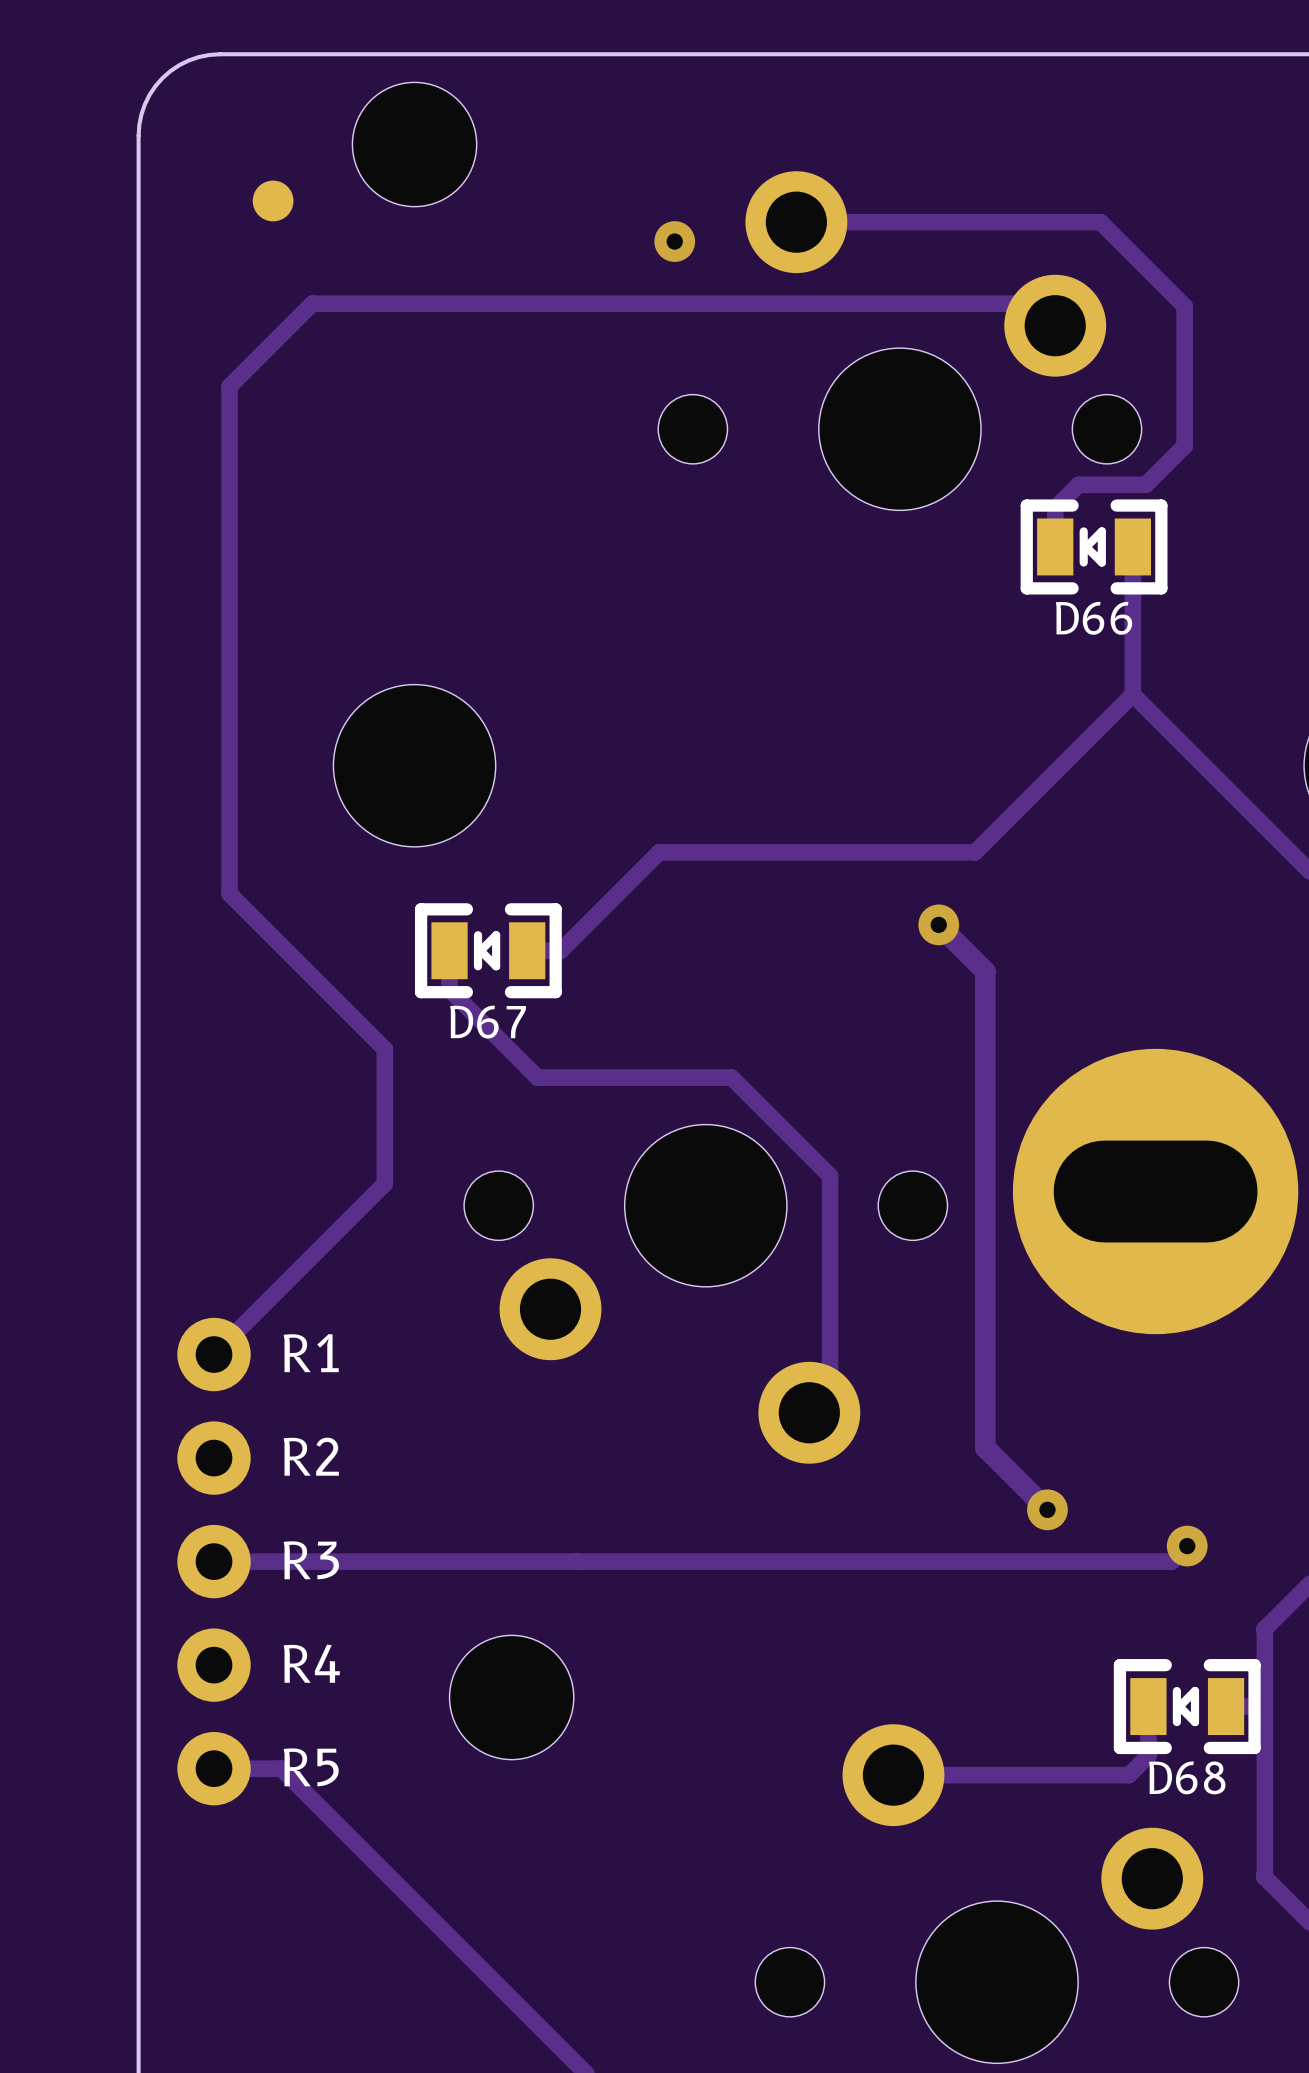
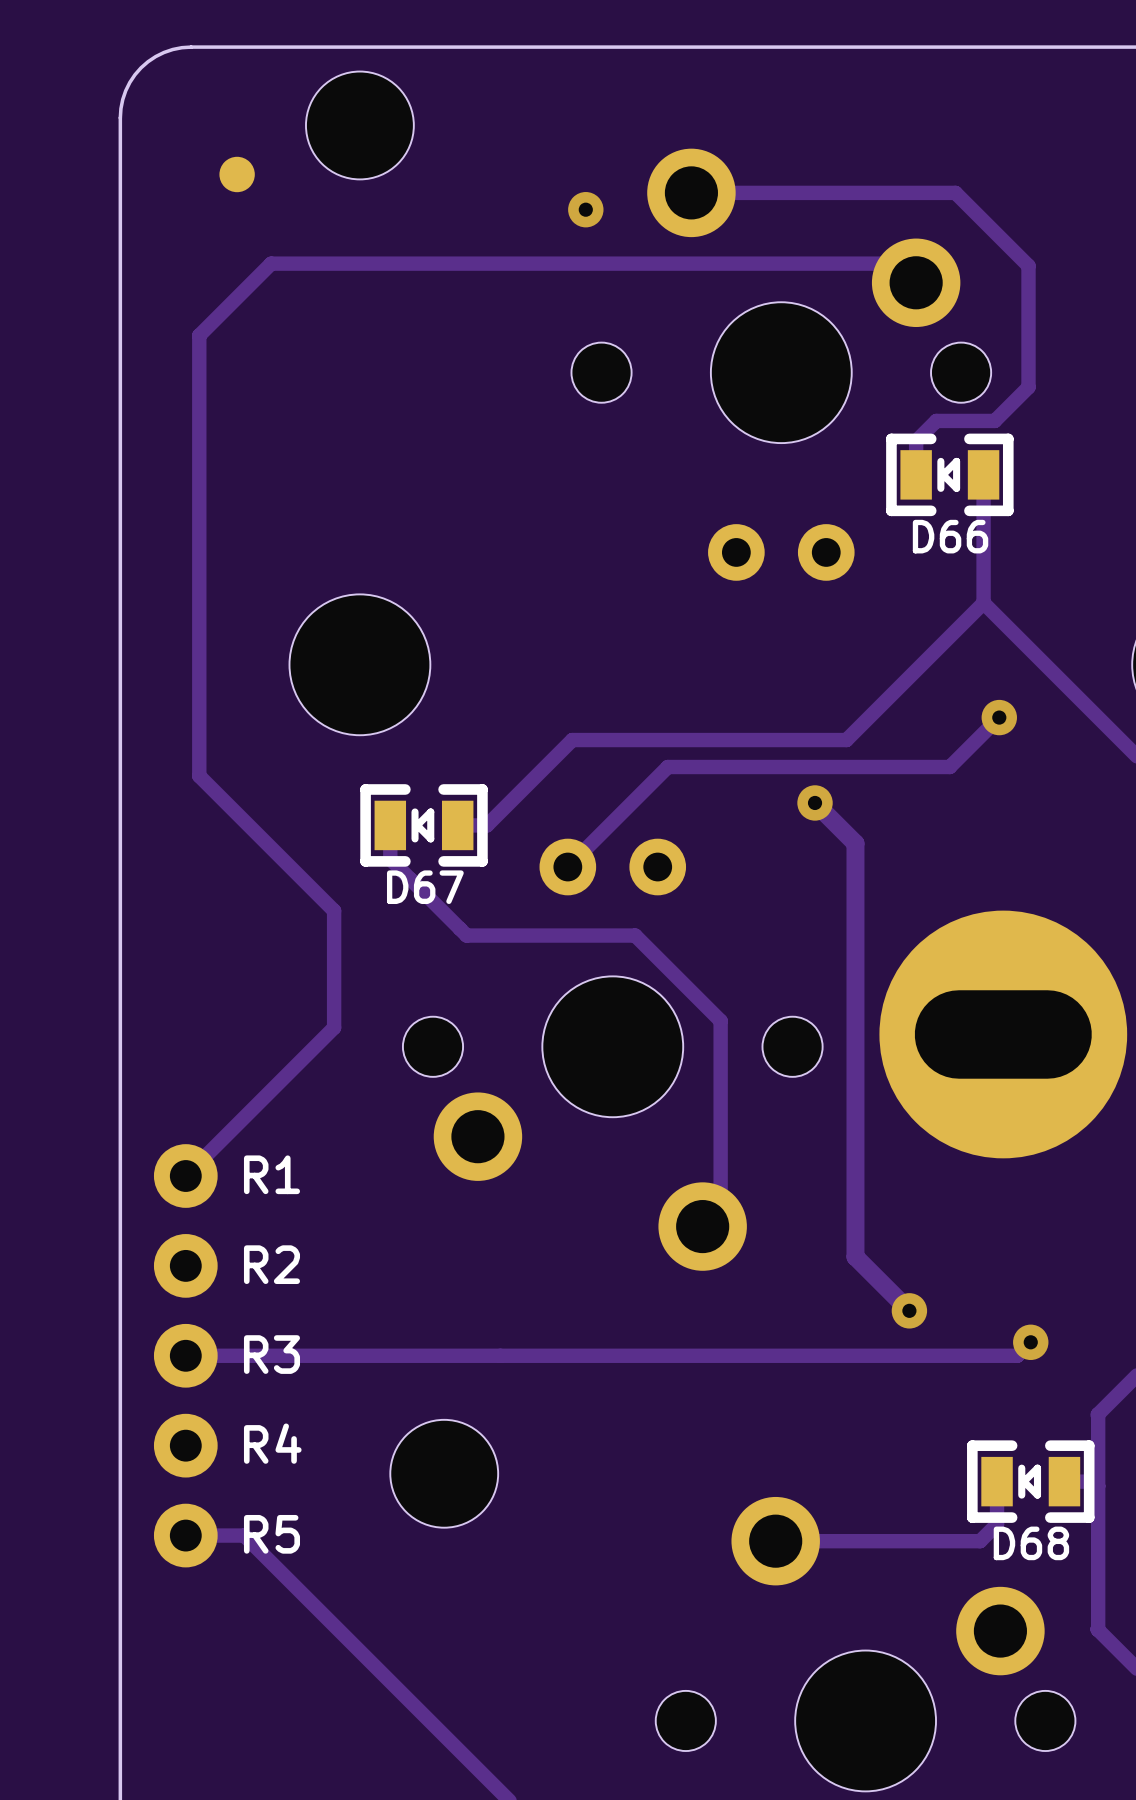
part: none -> (781, 552)
track: none -> (999, 717) (949, 767) (667, 767) (567, 867)
via: none -> (999, 717)
part: none -> (612, 867)

